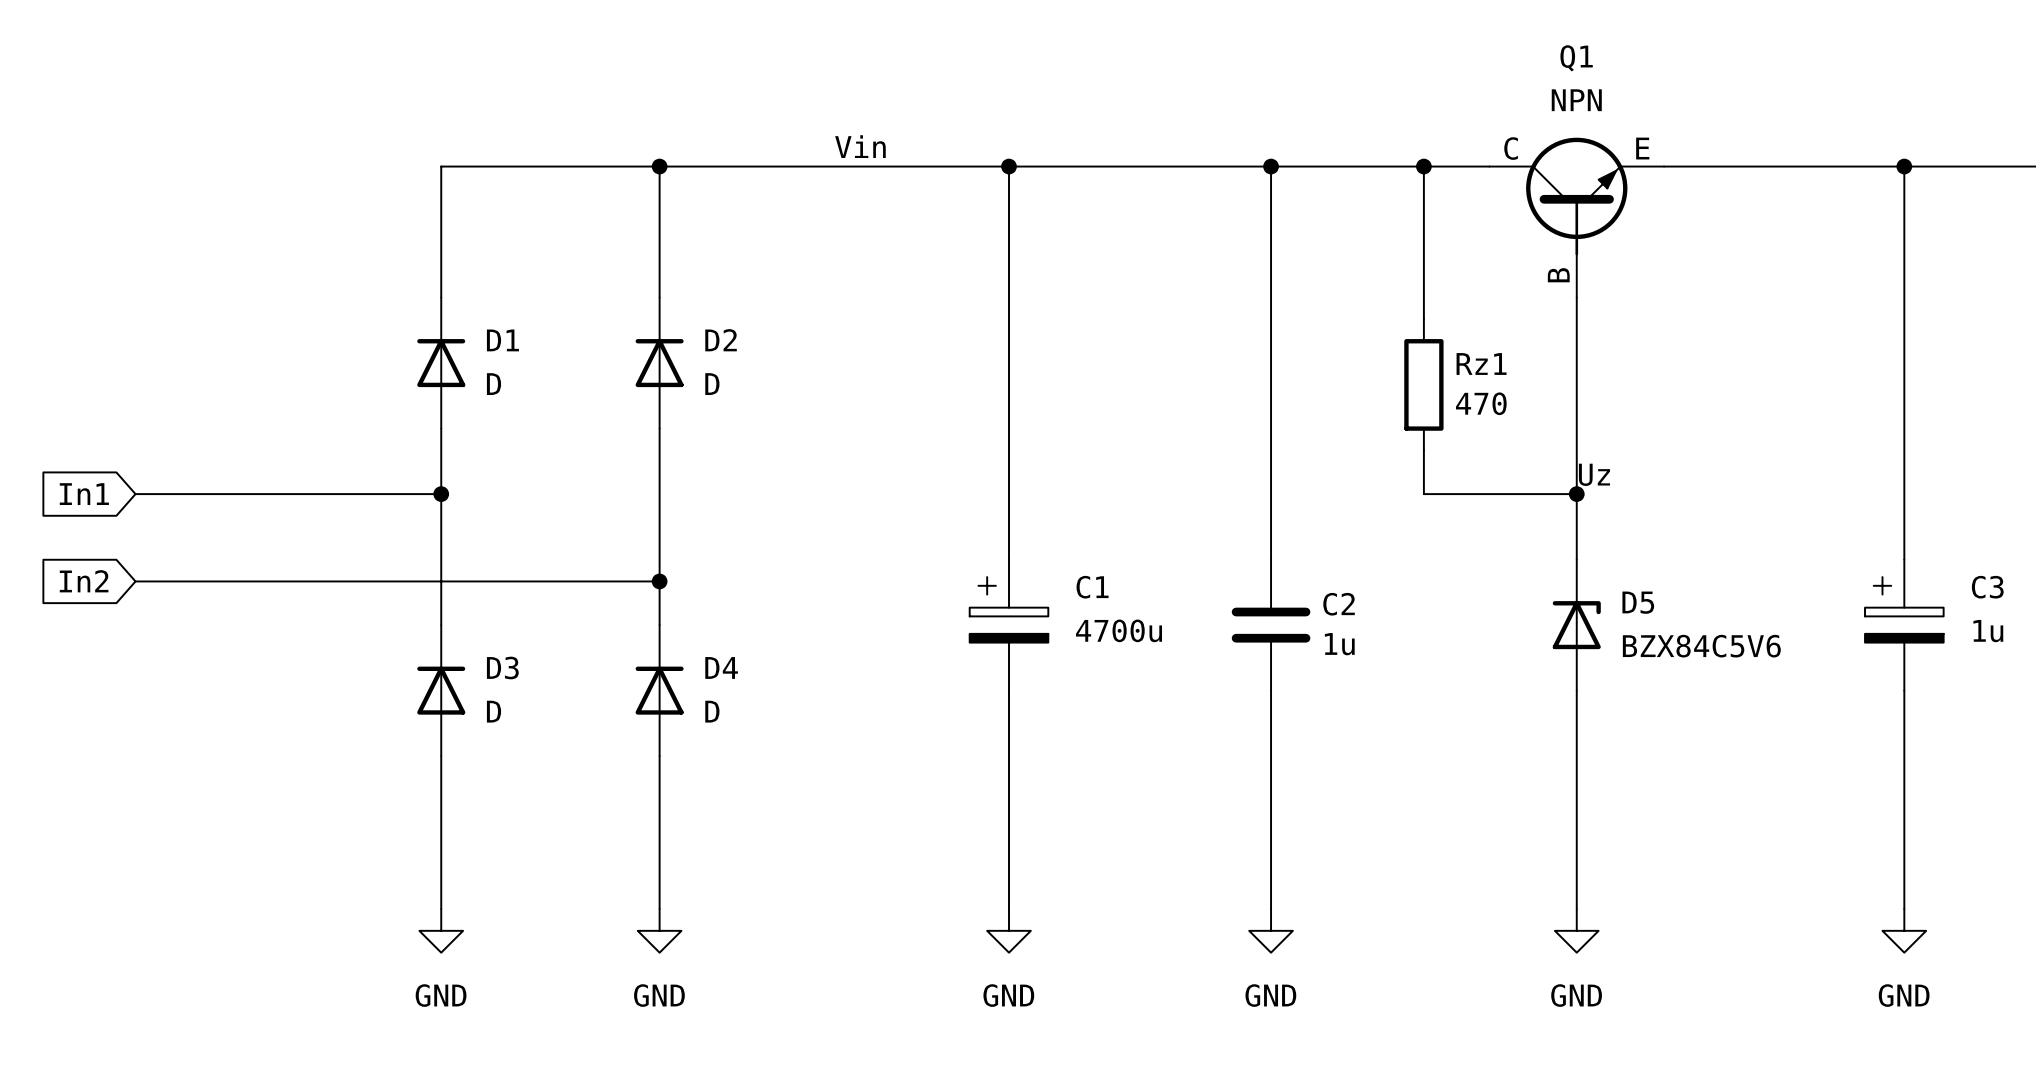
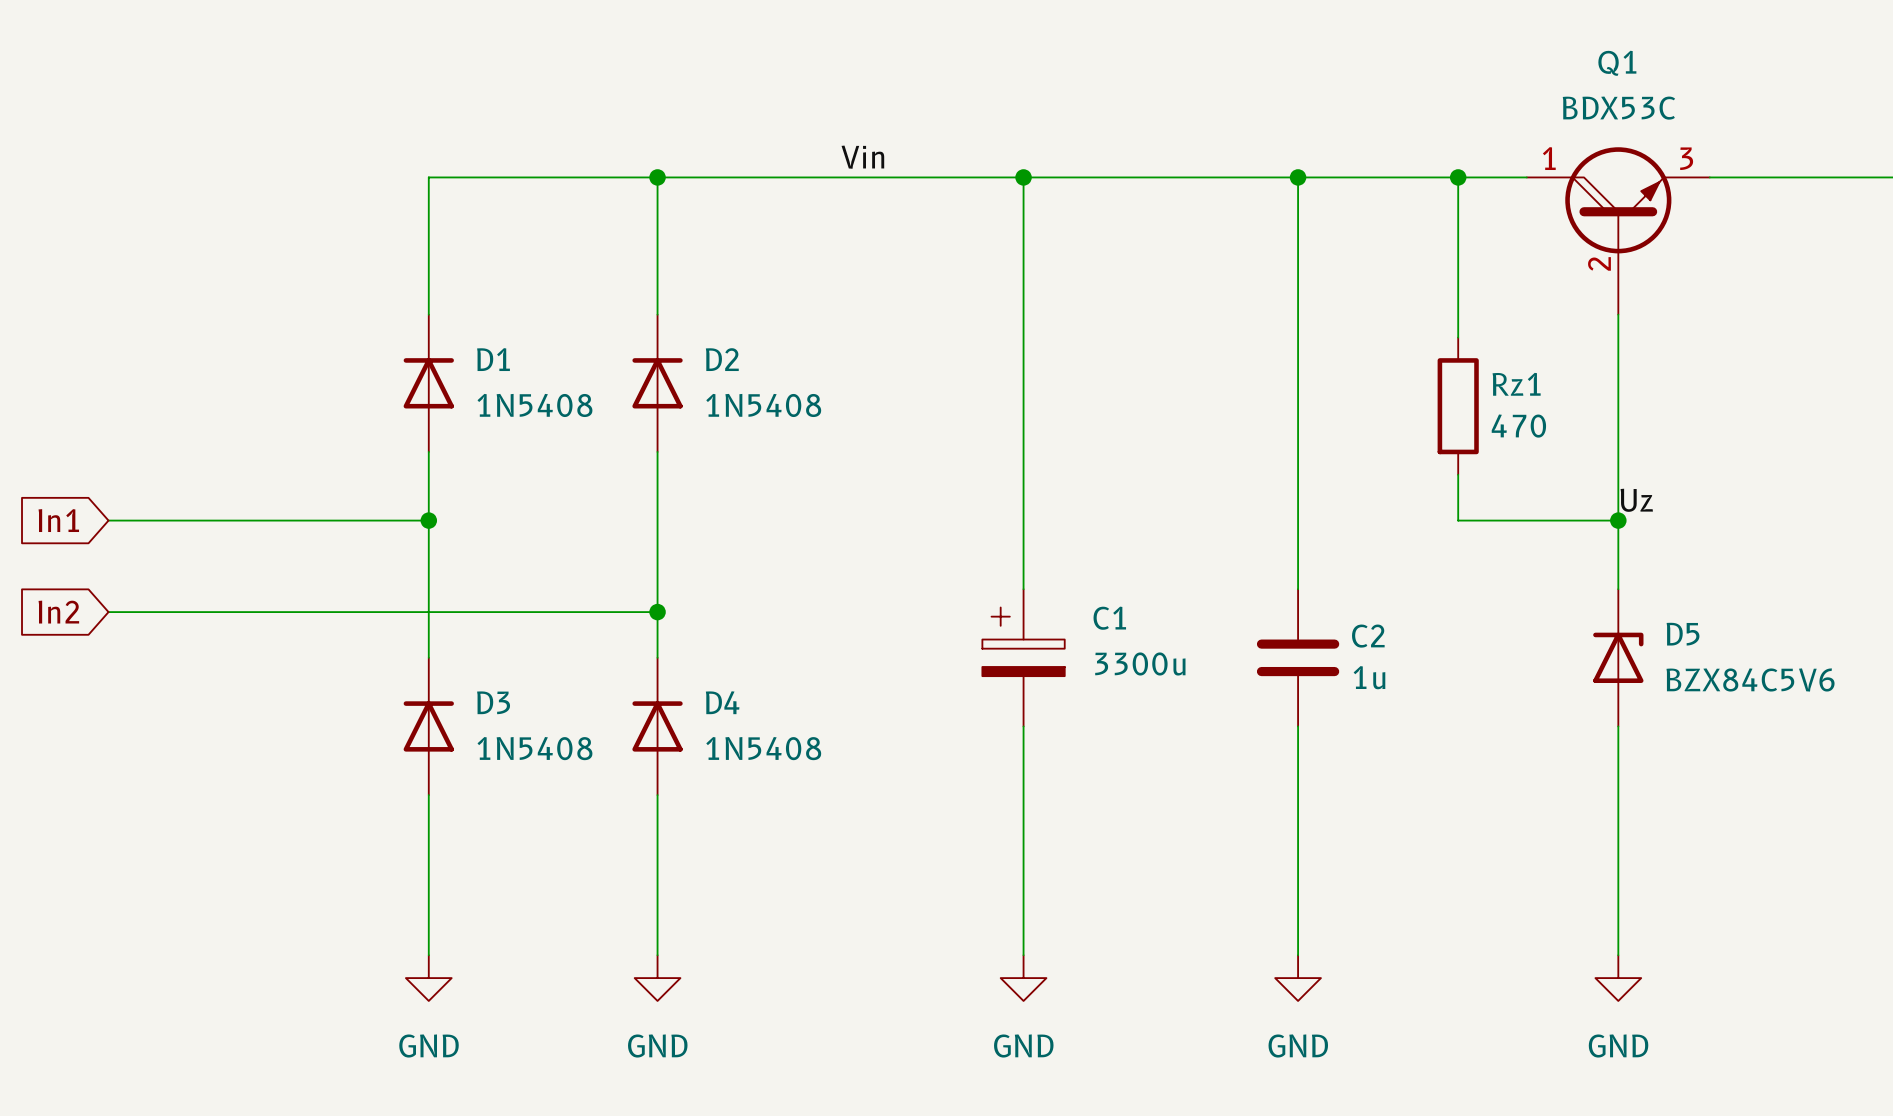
Q1 value: NPN (1576, 100) -> BDX53C (1618, 108)
Q1 symbol: [1489, 137, 1665, 298] -> [1526, 147, 1710, 315]
D1 value: D (494, 384) -> 1N5408 (534, 405)
D2 value: D (712, 384) -> 1N5408 (763, 405)
C1 value: 4700u (1119, 630) -> 3300u (1140, 663)
D3 value: D (494, 711) -> 1N5408 (534, 748)
D4 value: D (712, 711) -> 1N5408 (763, 748)

